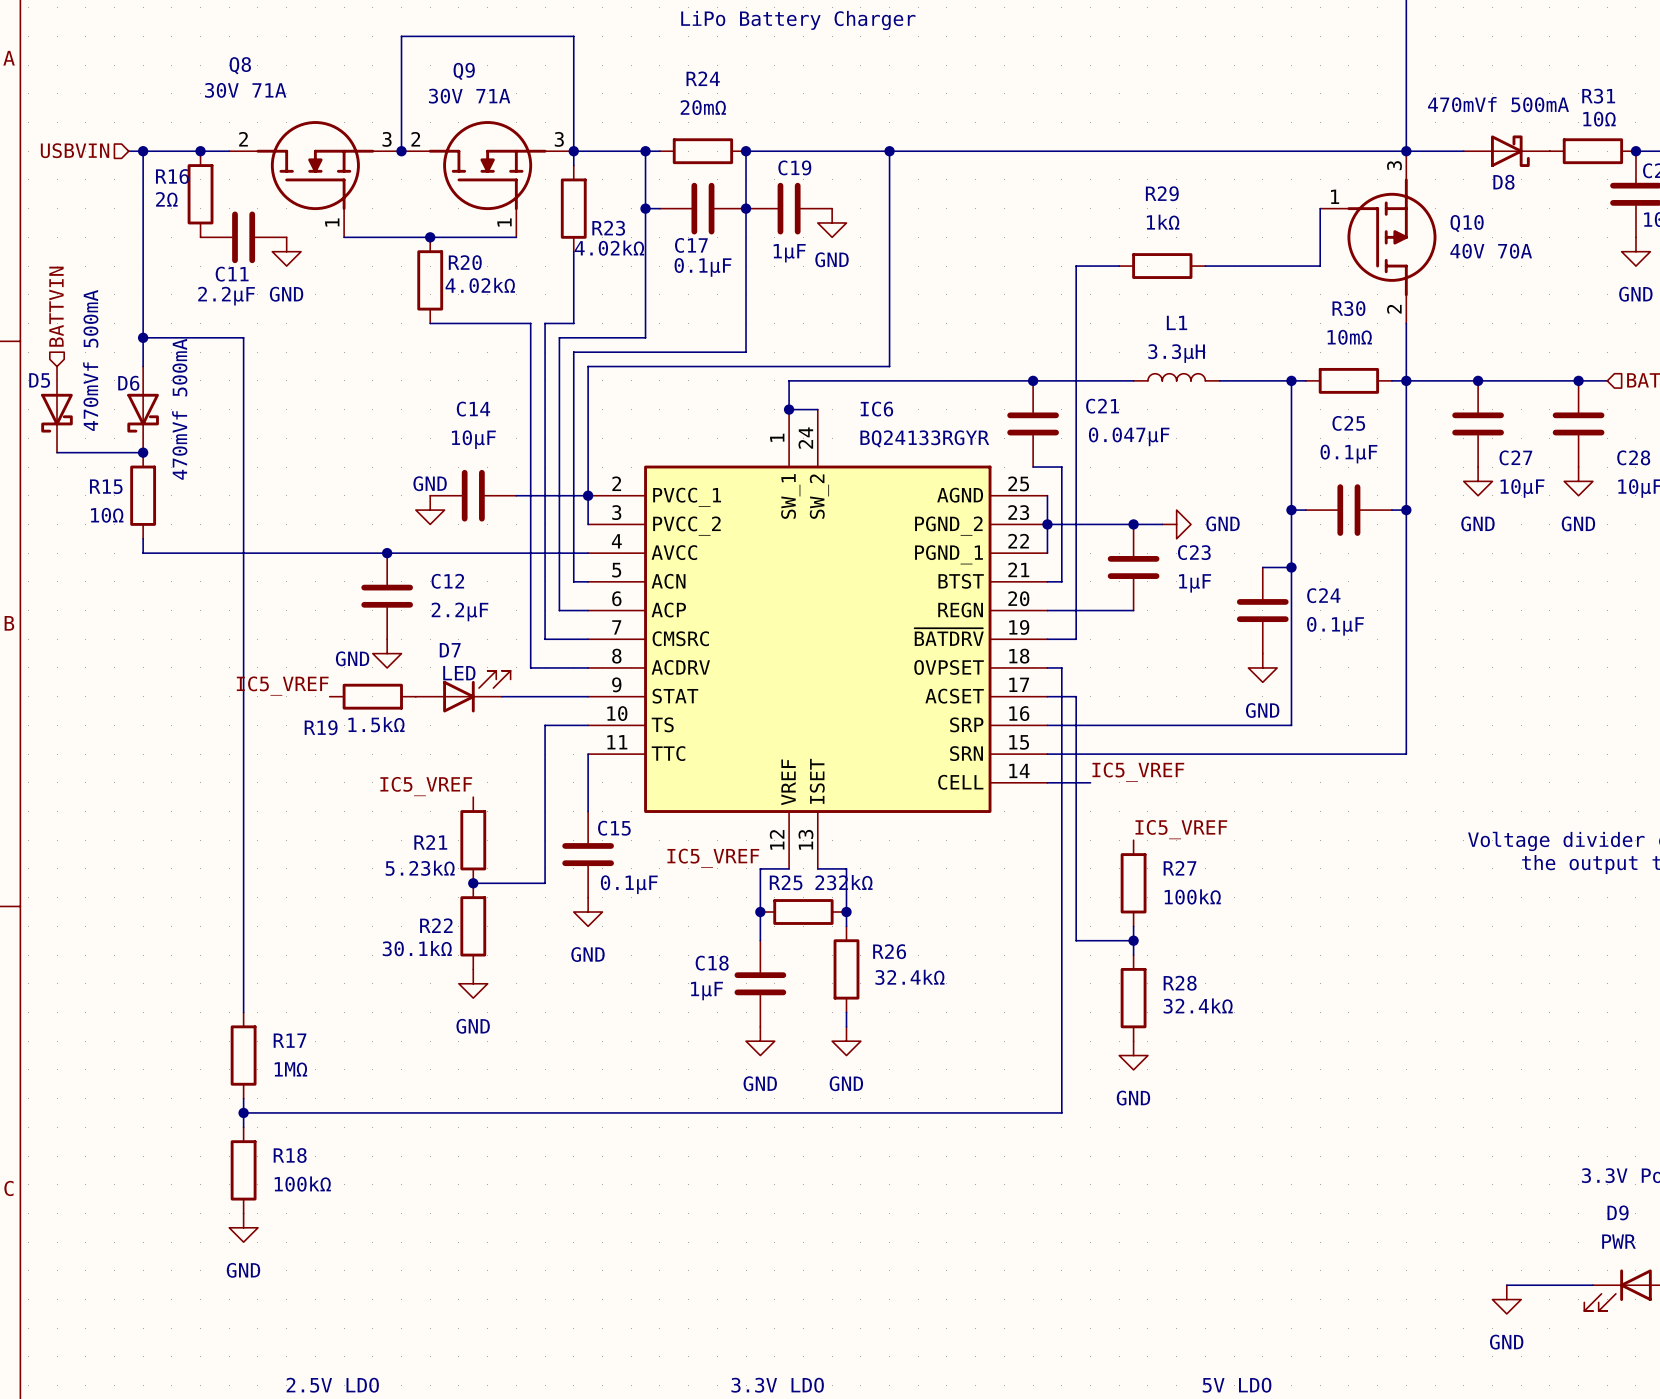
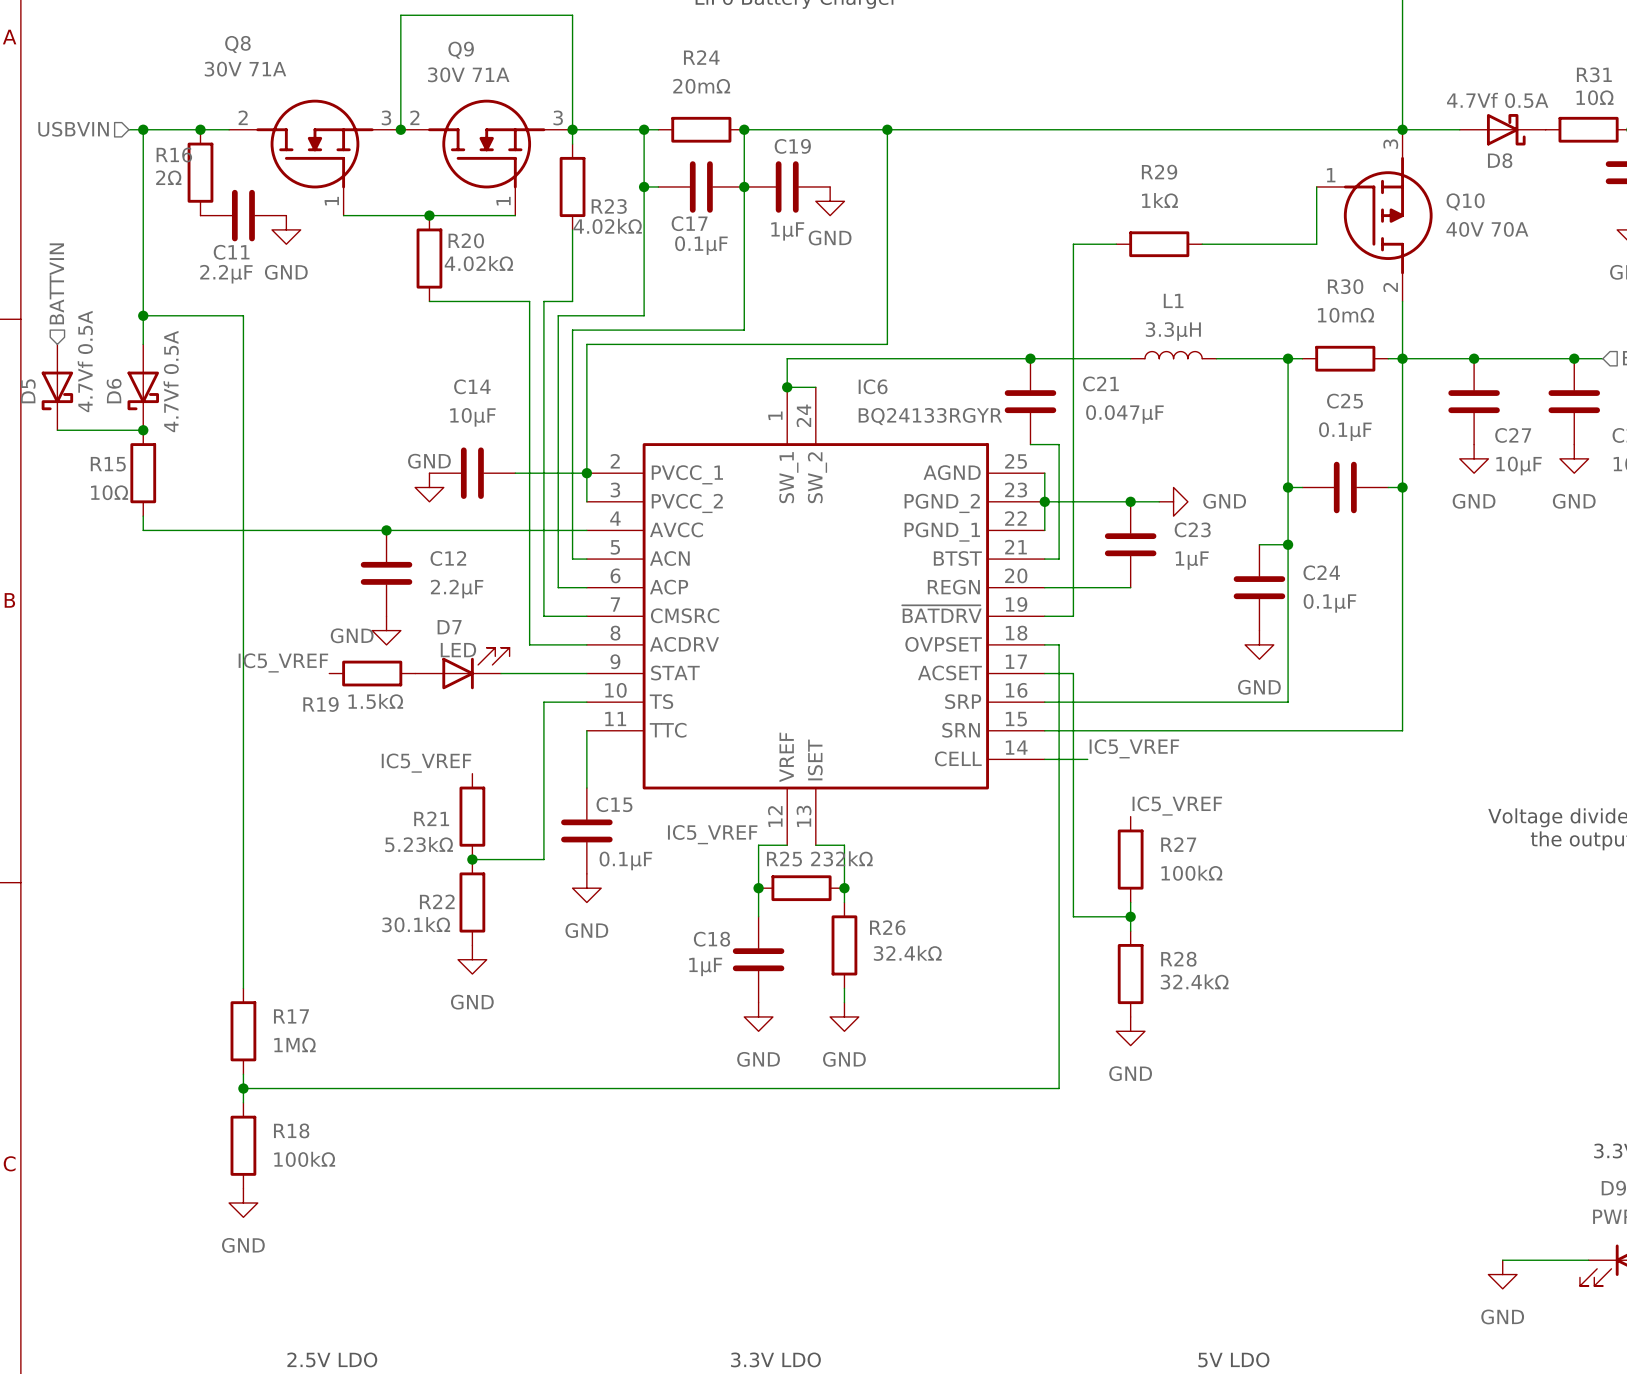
D8 value: 470mVf 500mA (1498, 104) -> 4.7Vf 0.5A (1497, 100)
D5 value: 470mVf 500mA (90, 360) -> 4.7Vf 0.5A (85, 361)
D5 name rotation: 0° (39, 380) -> 90° counterclockwise (28, 391)
D6 name rotation: 0° (128, 383) -> 90° counterclockwise (114, 391)
D6 value: 470mVf 500mA (179, 409) -> 4.7Vf 0.5A (171, 381)

